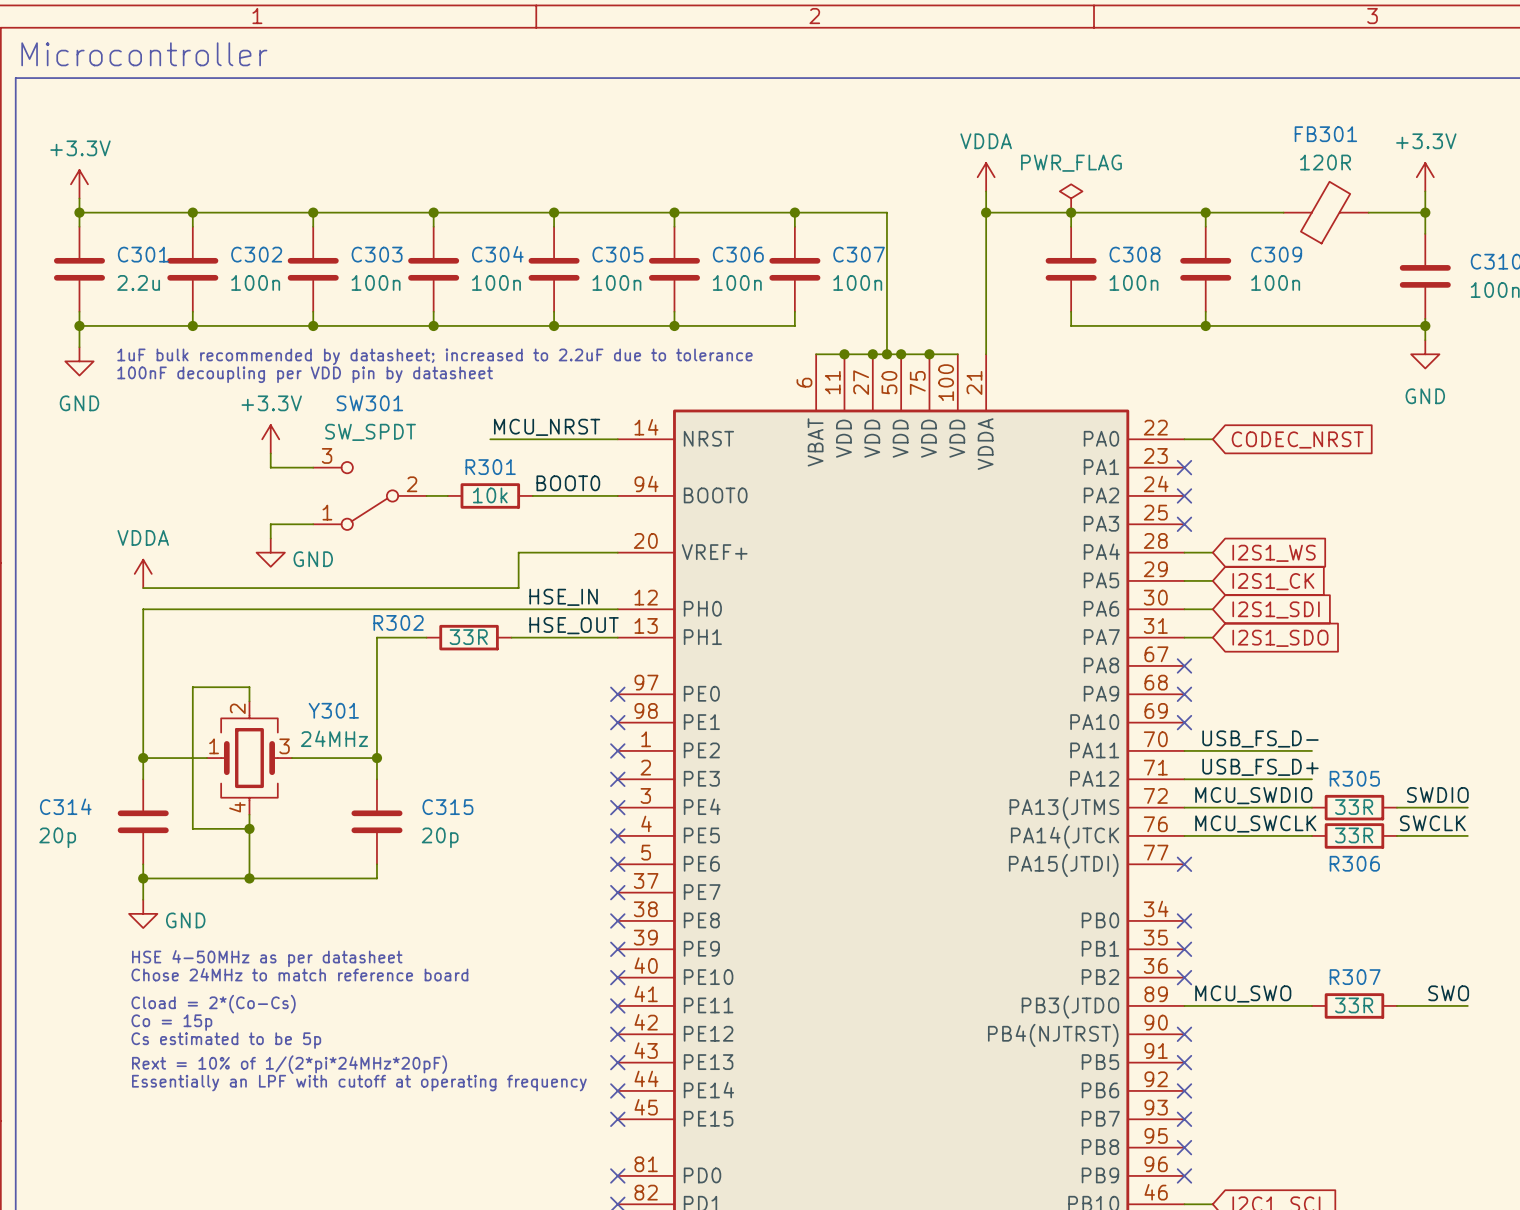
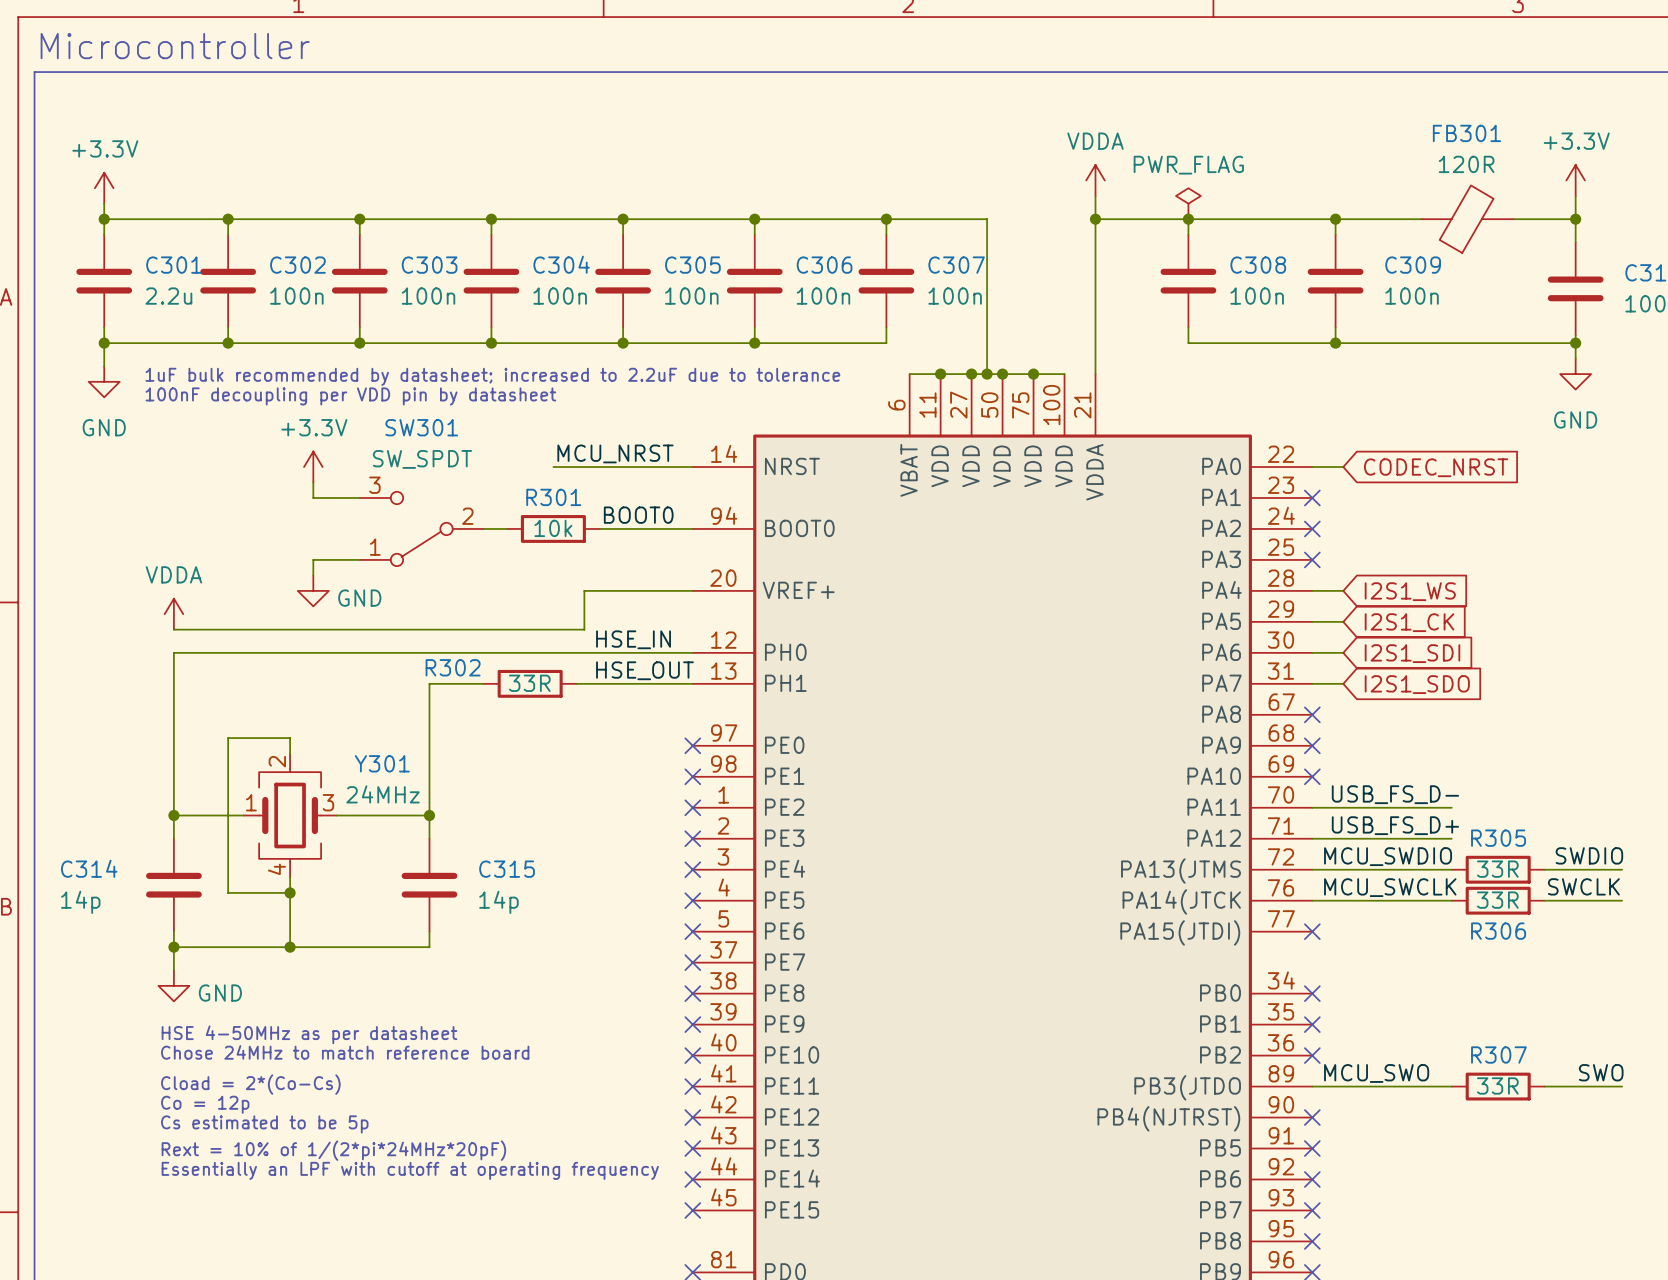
C314 value: 20p (57, 837) -> 14p (80, 902)
C315 value: 20p (440, 837) -> 14p (498, 902)
text: Co = 15p (171, 1022) -> Co = 12p (205, 1104)

